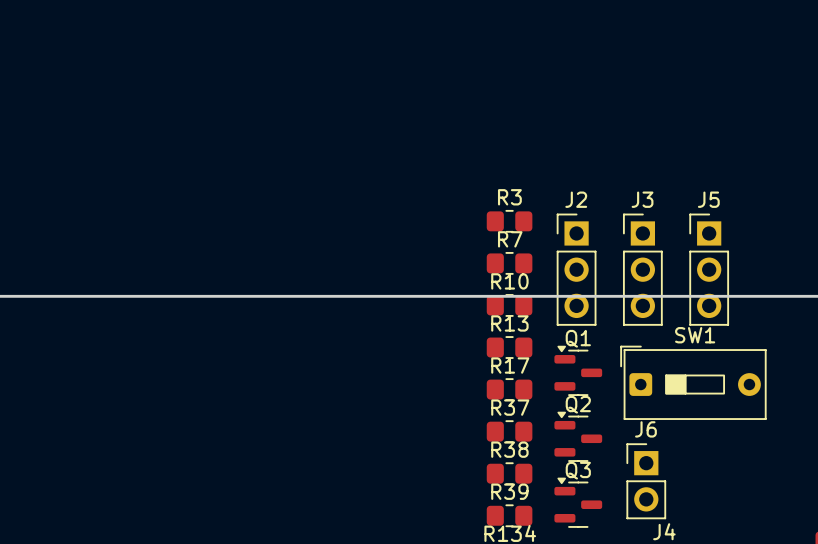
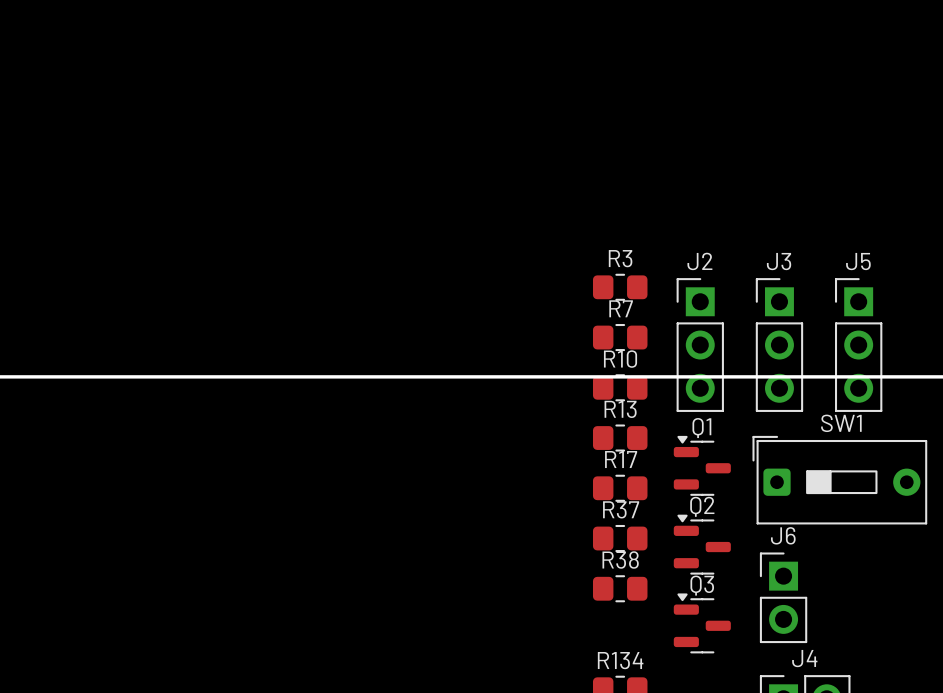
R39: (509, 515) -> none

